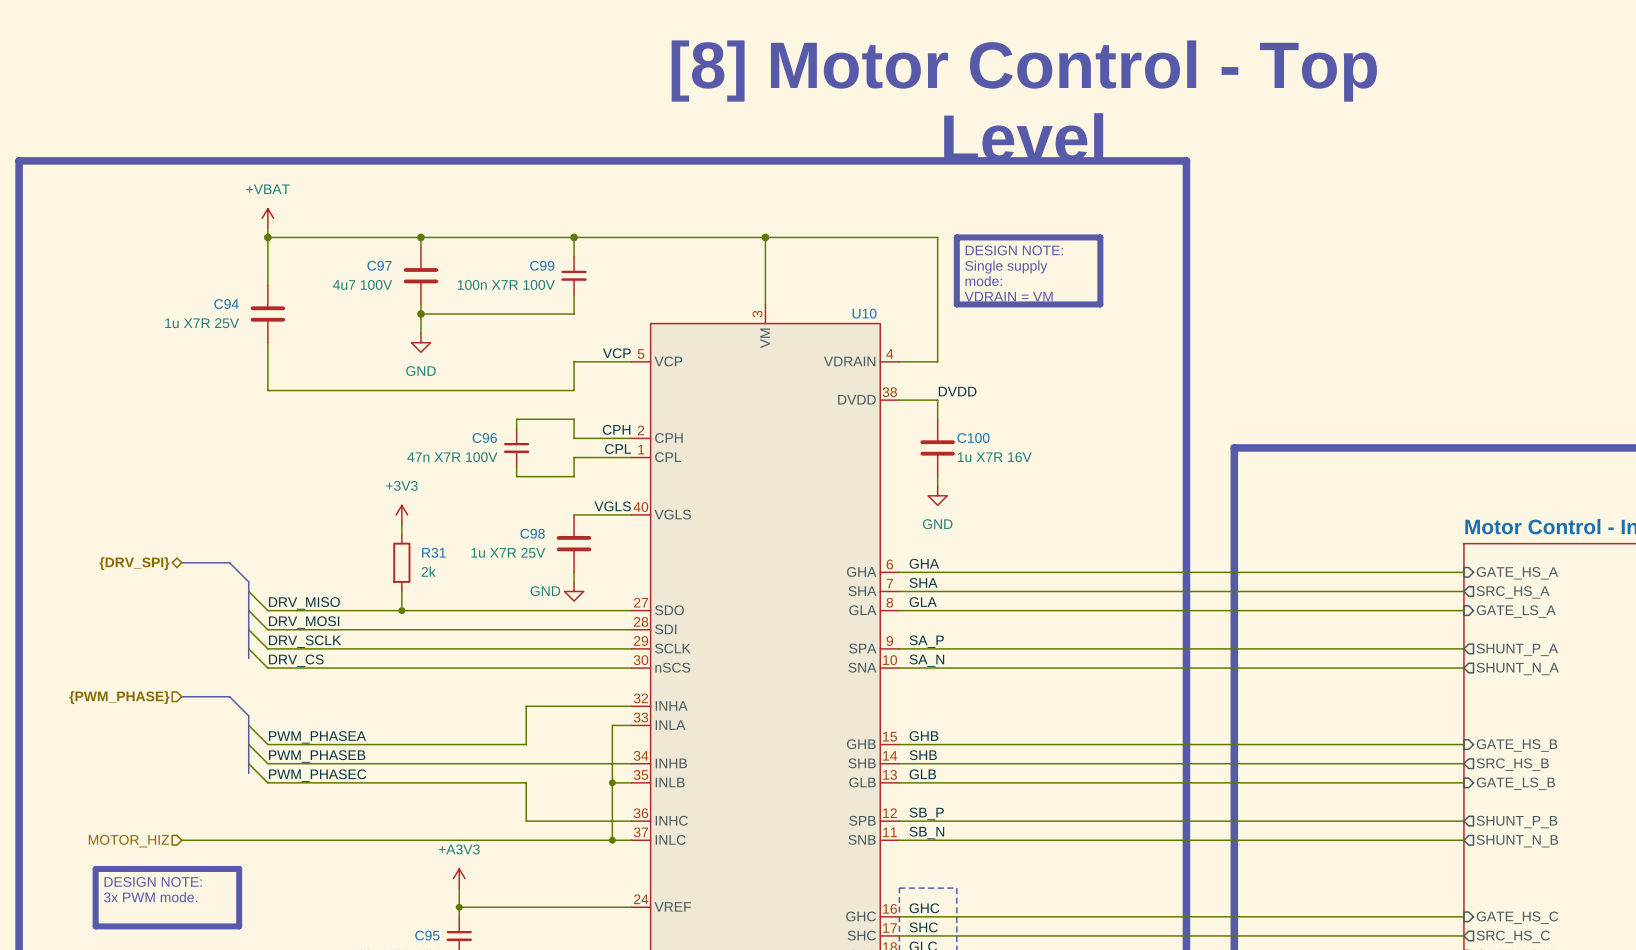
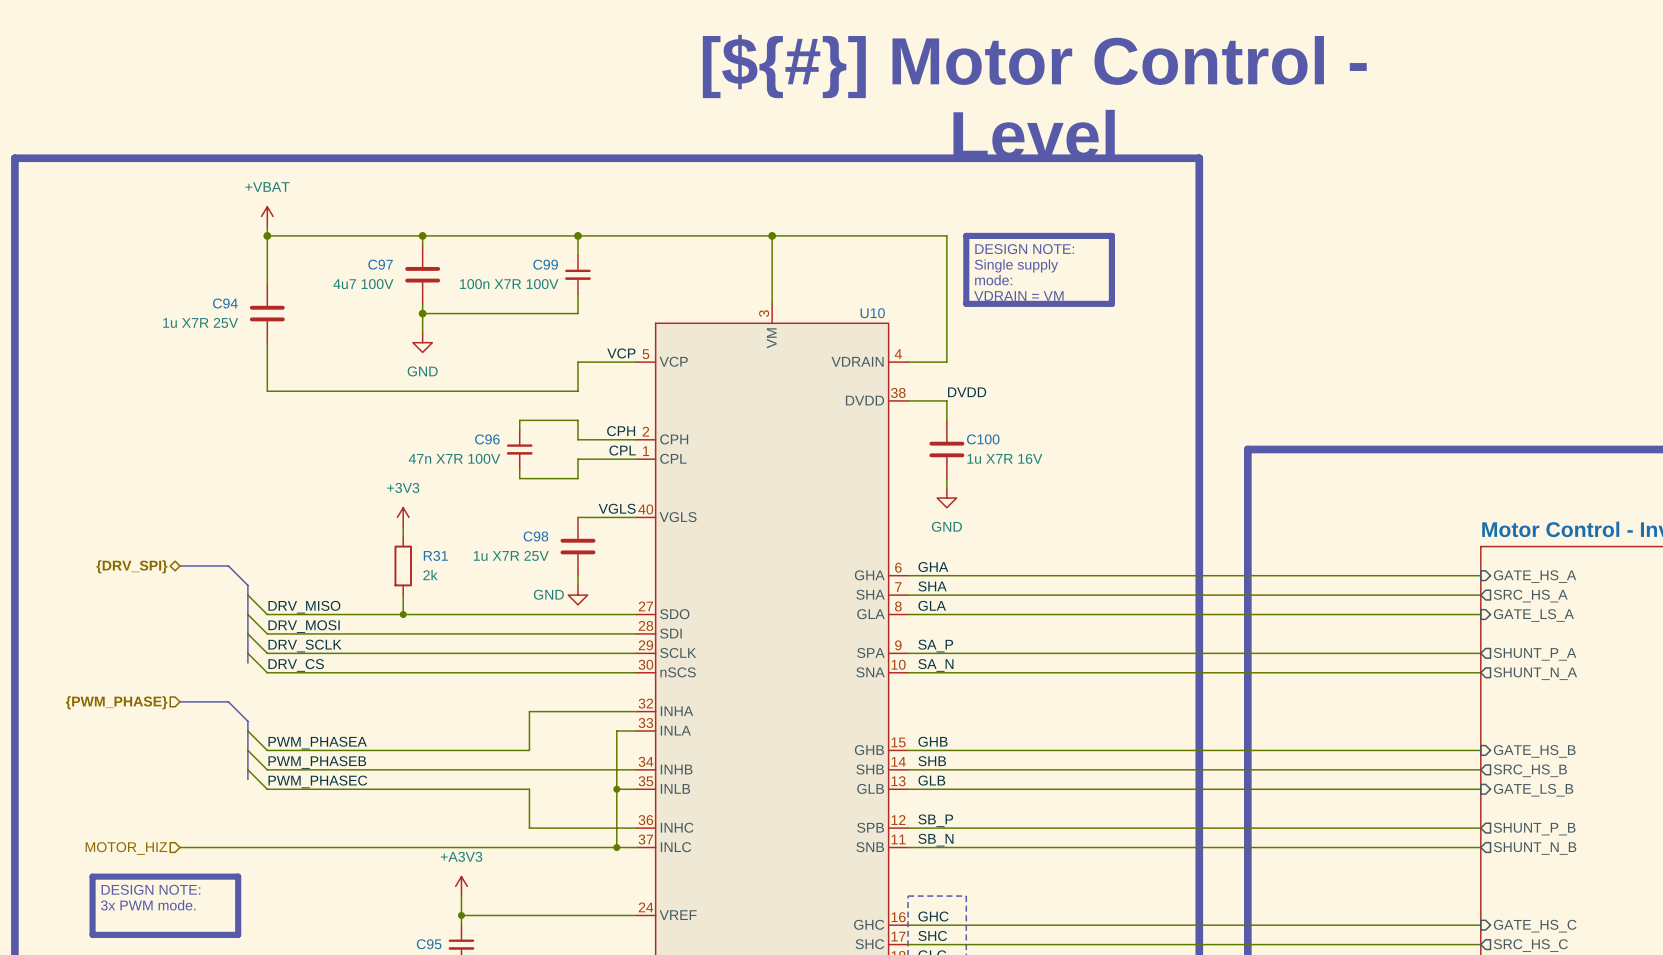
text: [8] Motor Control - Top (1024, 71) -> [${#}] Motor Control - (1034, 66)

